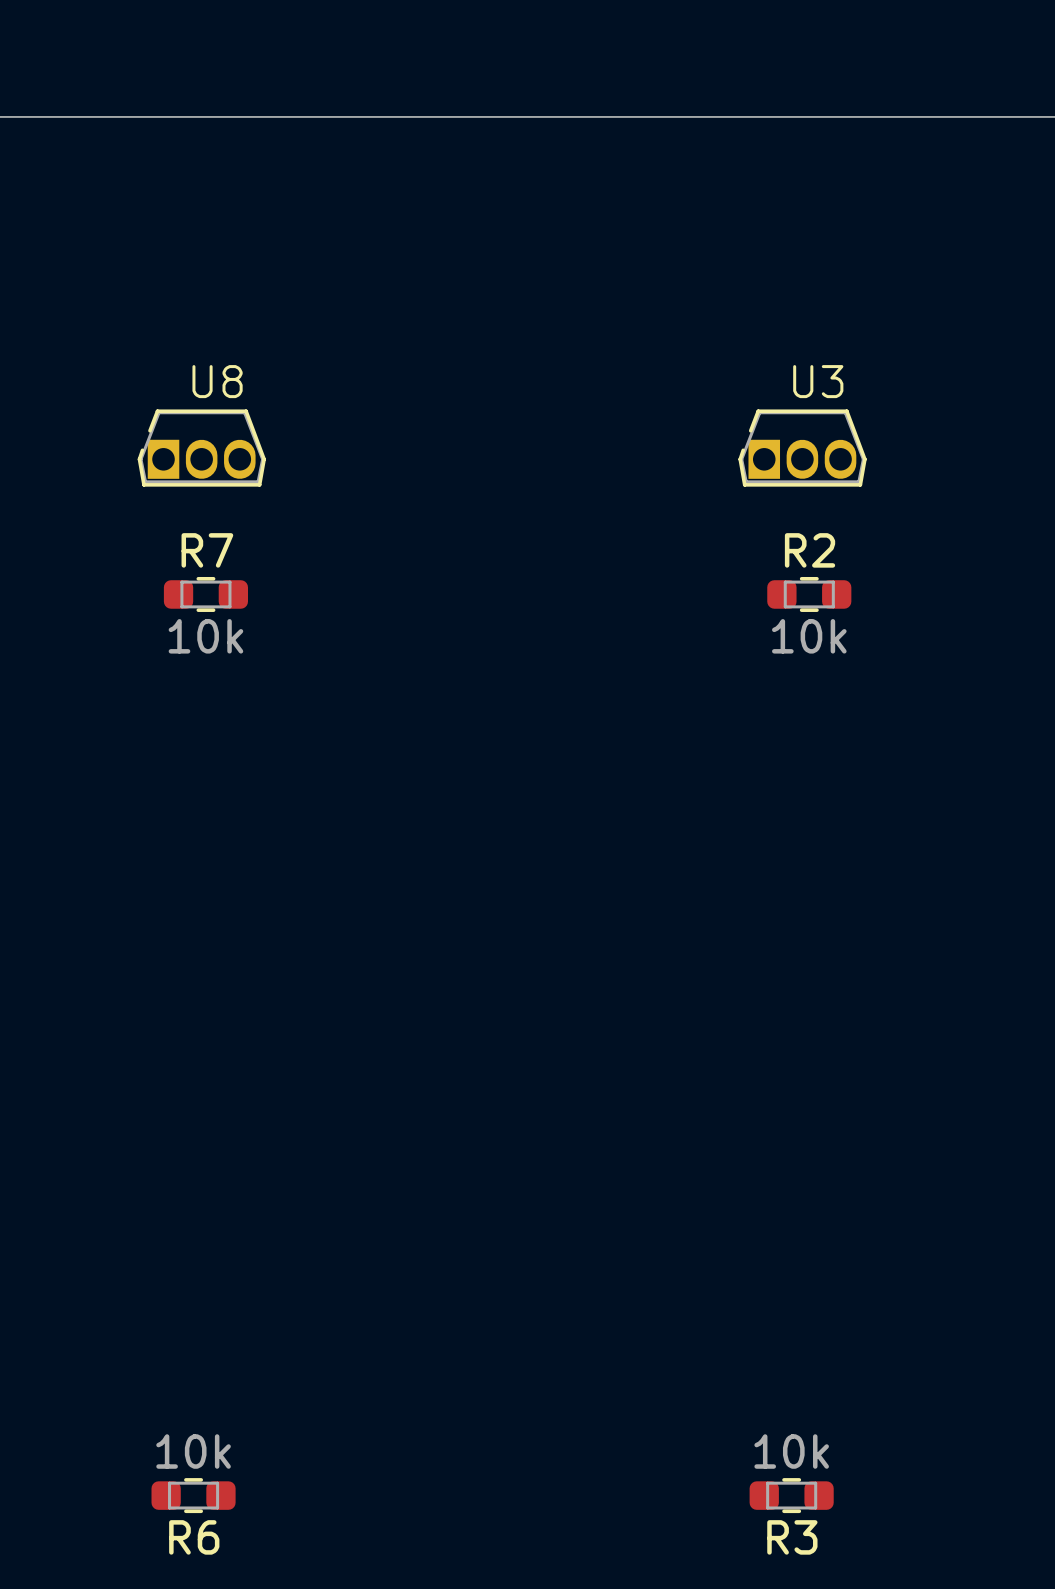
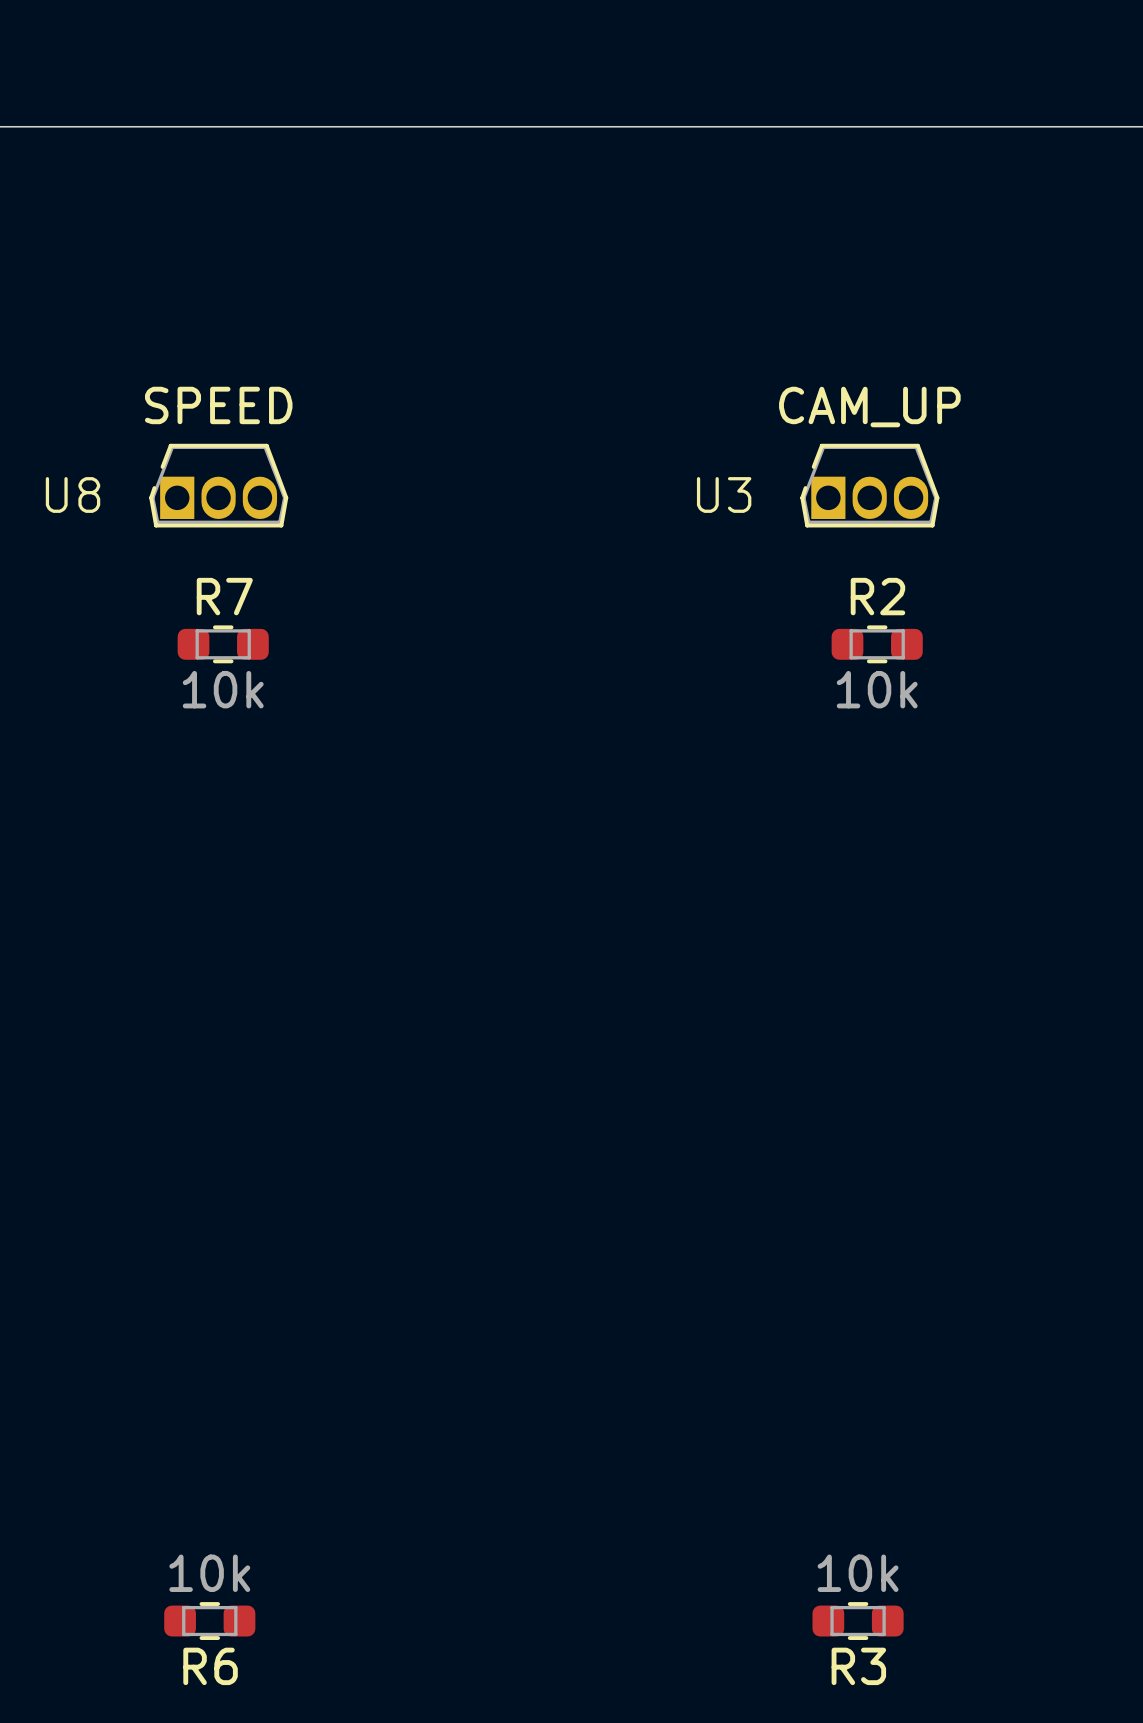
U8 value: none -> SPEED (218, 405)
U3 value: none -> CAM_UP (869, 407)
U8 name position: U8 (217, 381) -> U8 (73, 494)
U3 name position: U3 (818, 381) -> U3 (724, 494)

